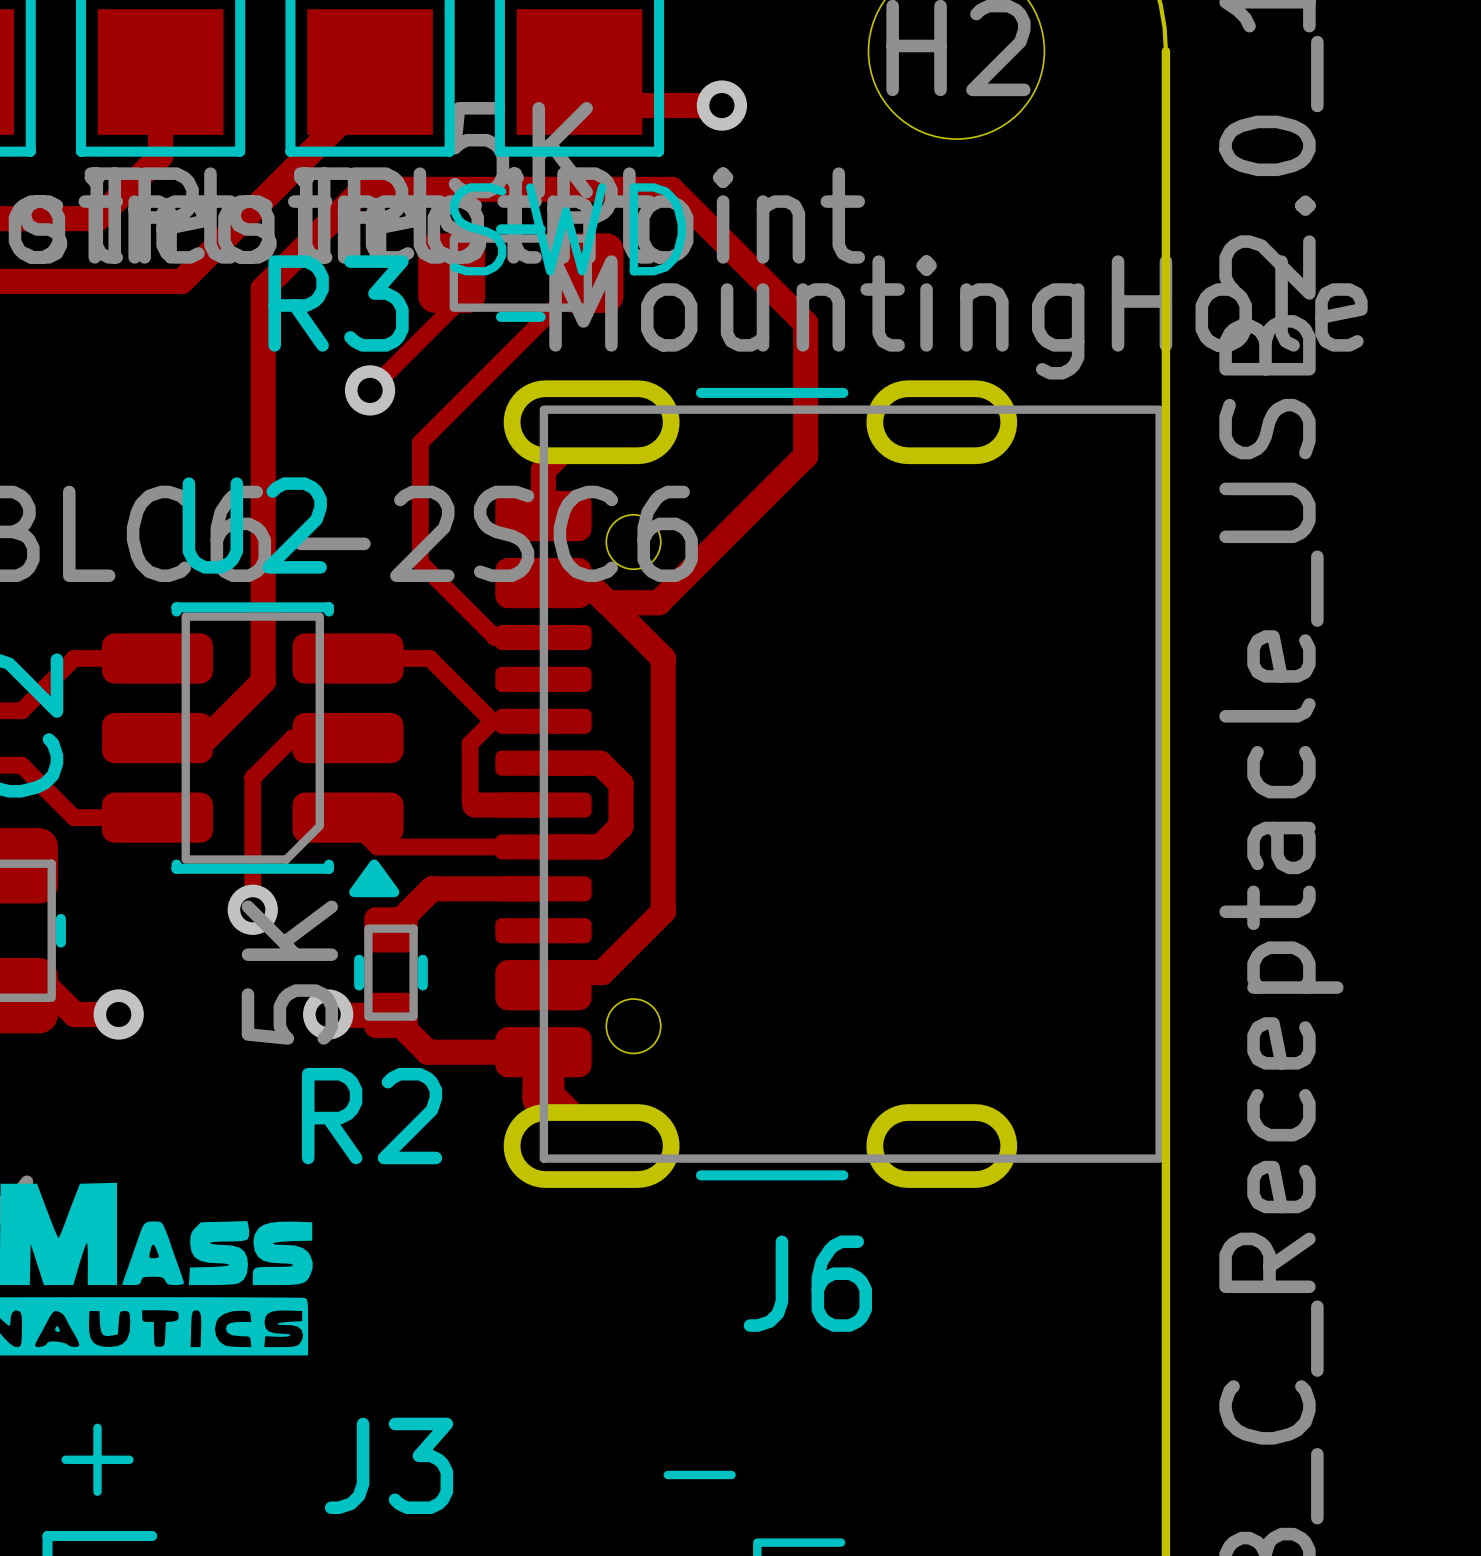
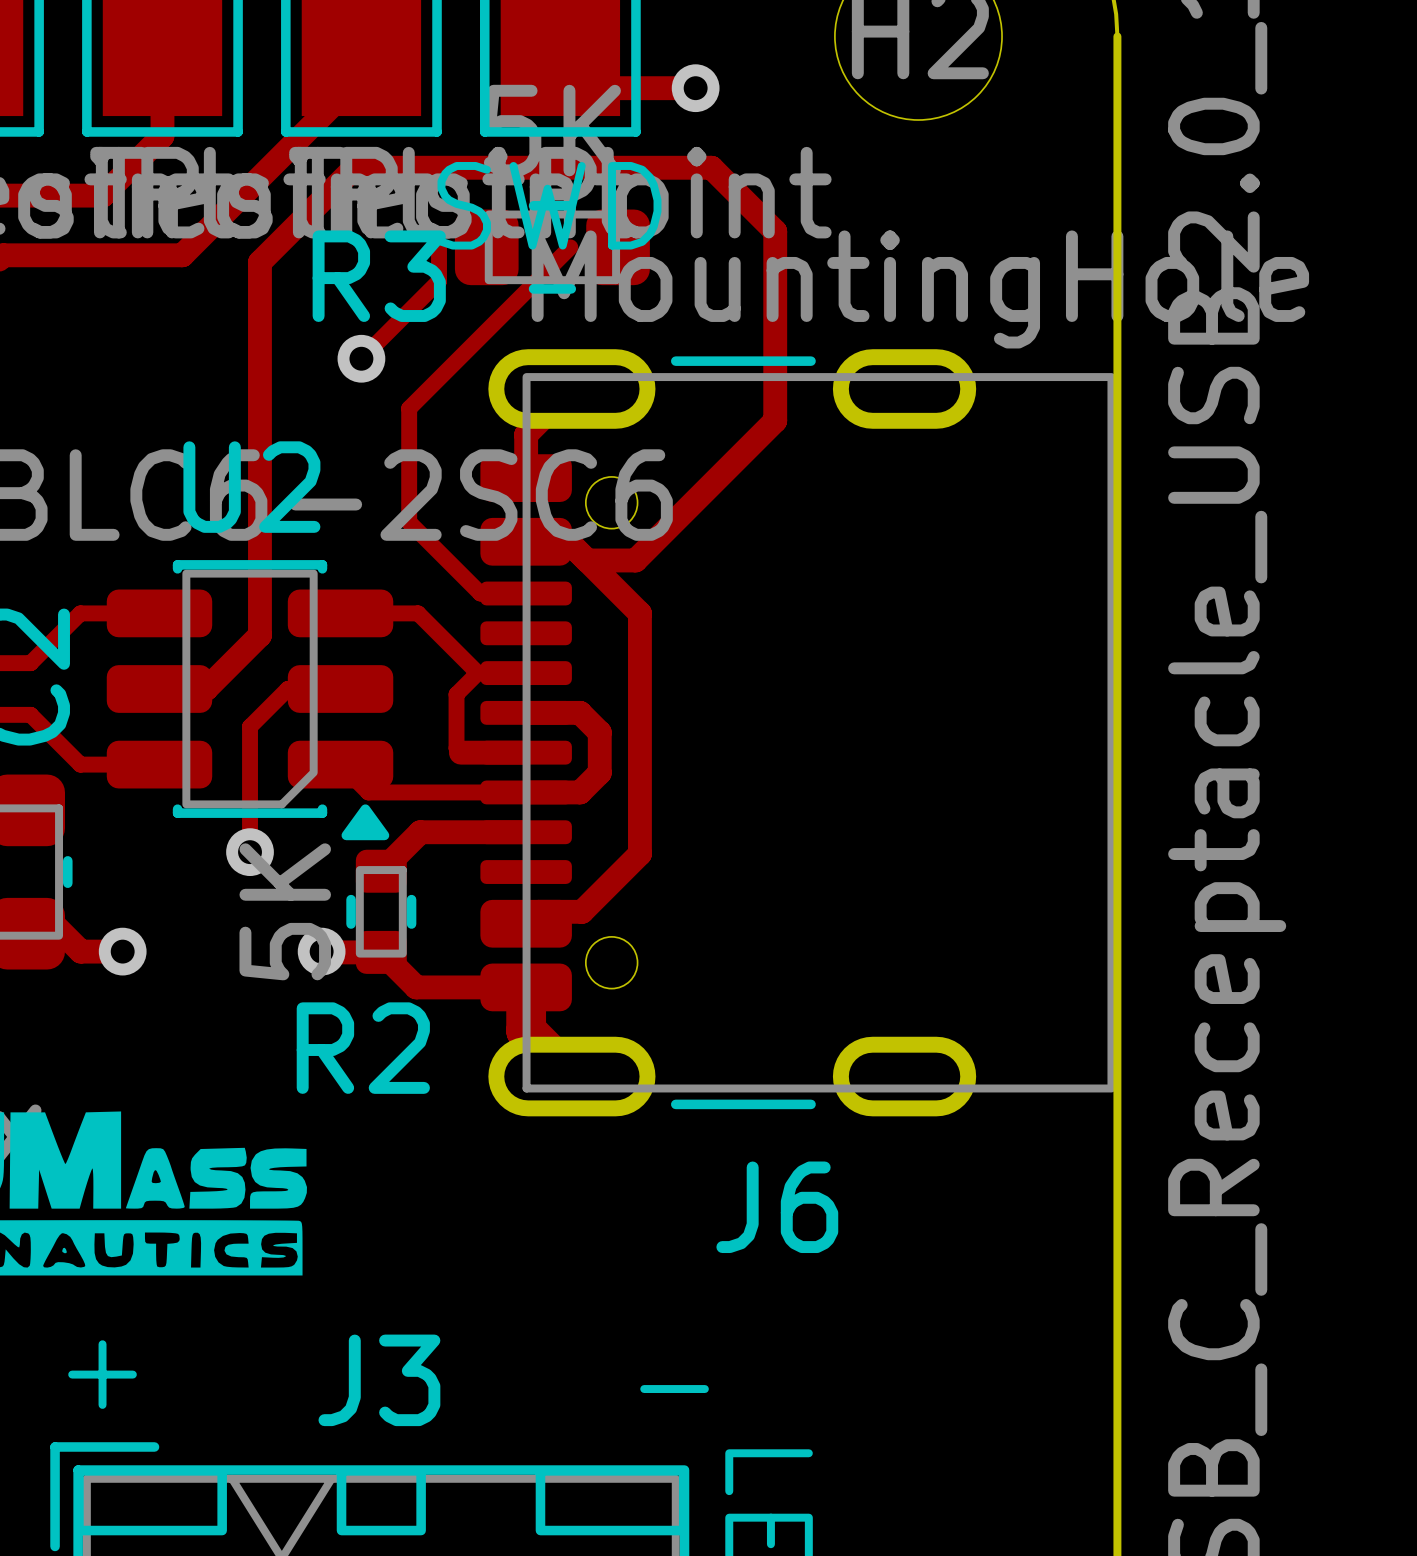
track: (671, 189) (805, 323) -> (647, 167) (711, 167) (775, 231) (775, 295)
R3 position: (520, 273) -> (552, 247)

